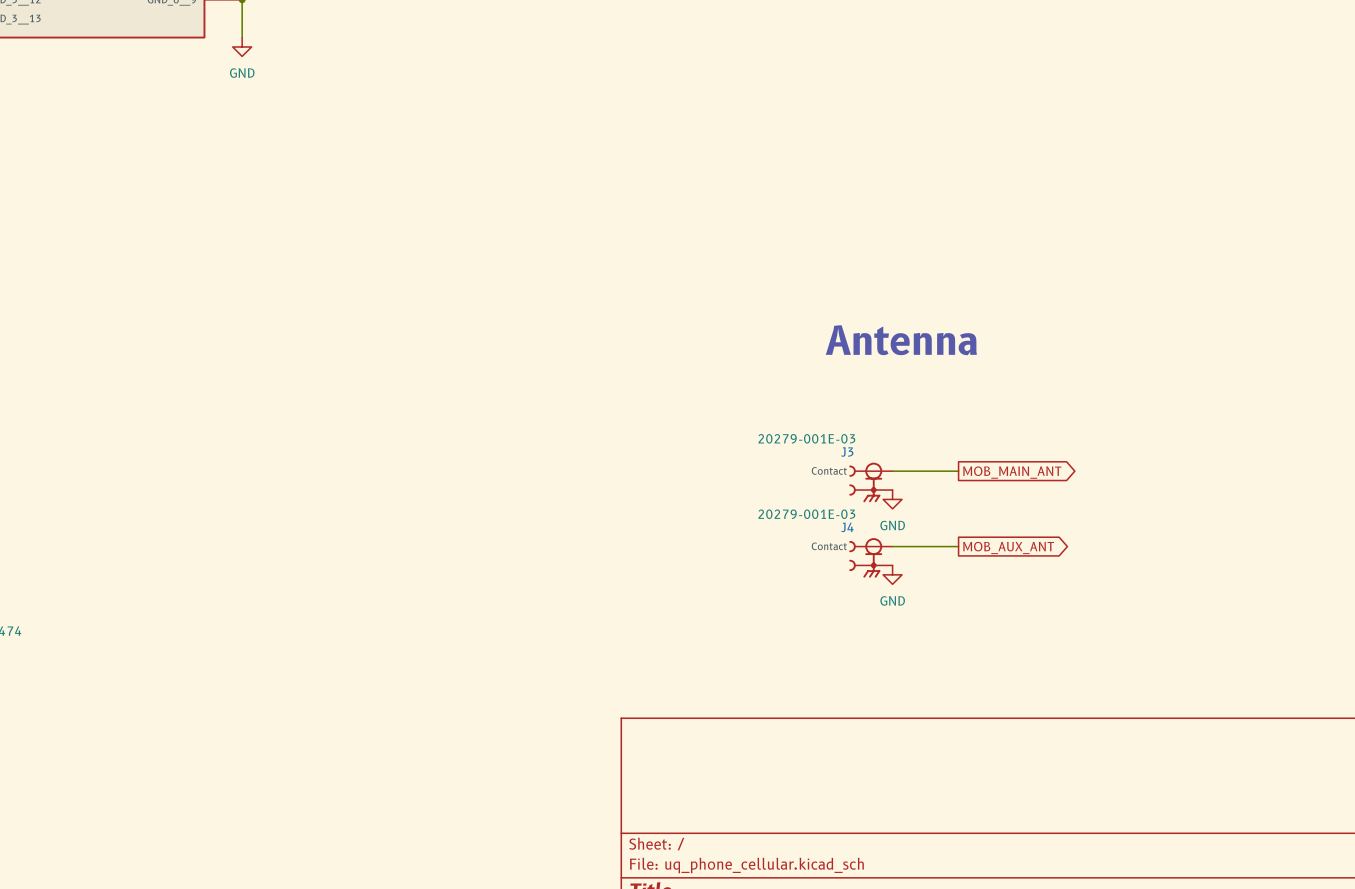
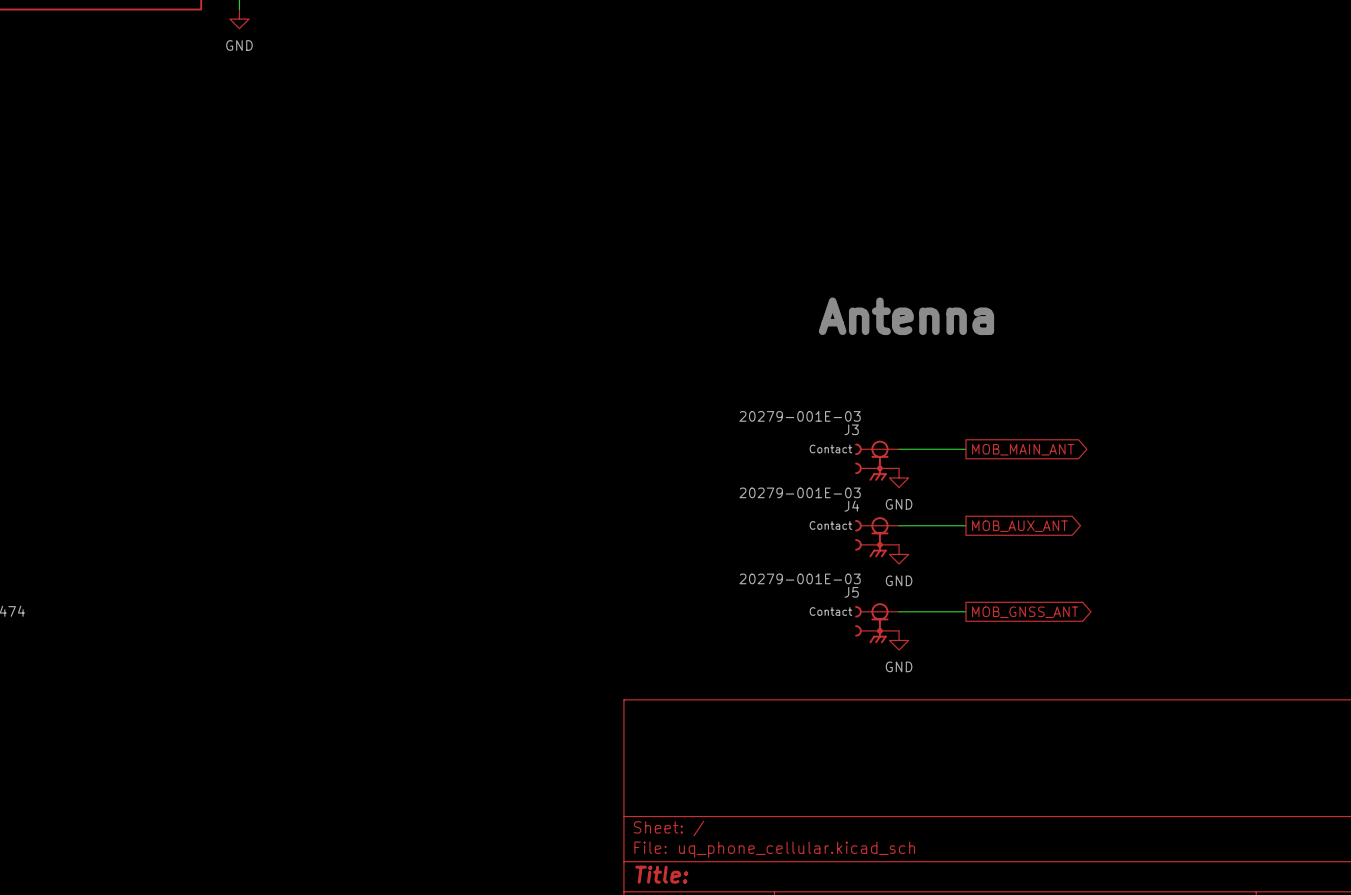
wire: none -> (899, 611) (965, 611)
global label: none -> MOB_GNSS_ANT (1025, 612)
J5: none -> 20279-001E-03 (877, 623)
power symbol: none -> GND (899, 640)

